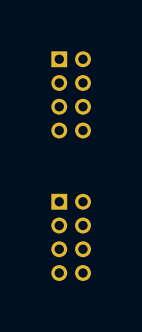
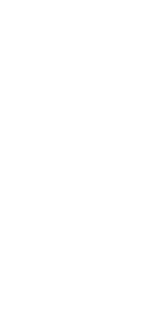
part: (71, 94) -> none
part: (71, 237) -> none

